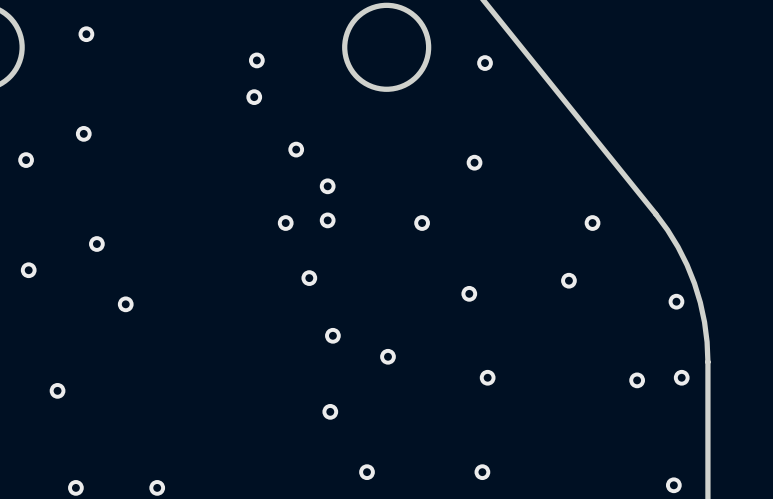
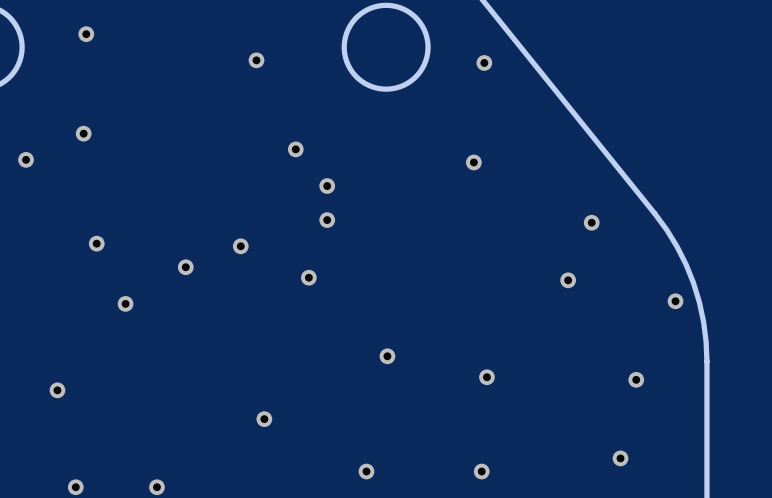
via: (254, 97) -> none
via position: (285, 223) -> (240, 246)
via: (422, 223) -> none
via: none -> (185, 267)
via: (28, 270) -> none
via: (469, 293) -> none
via: (332, 335) -> none
via: (681, 377) -> none
via: (330, 411) -> none
via: none -> (264, 419)
via: none -> (620, 458)
via: (673, 485) -> none

